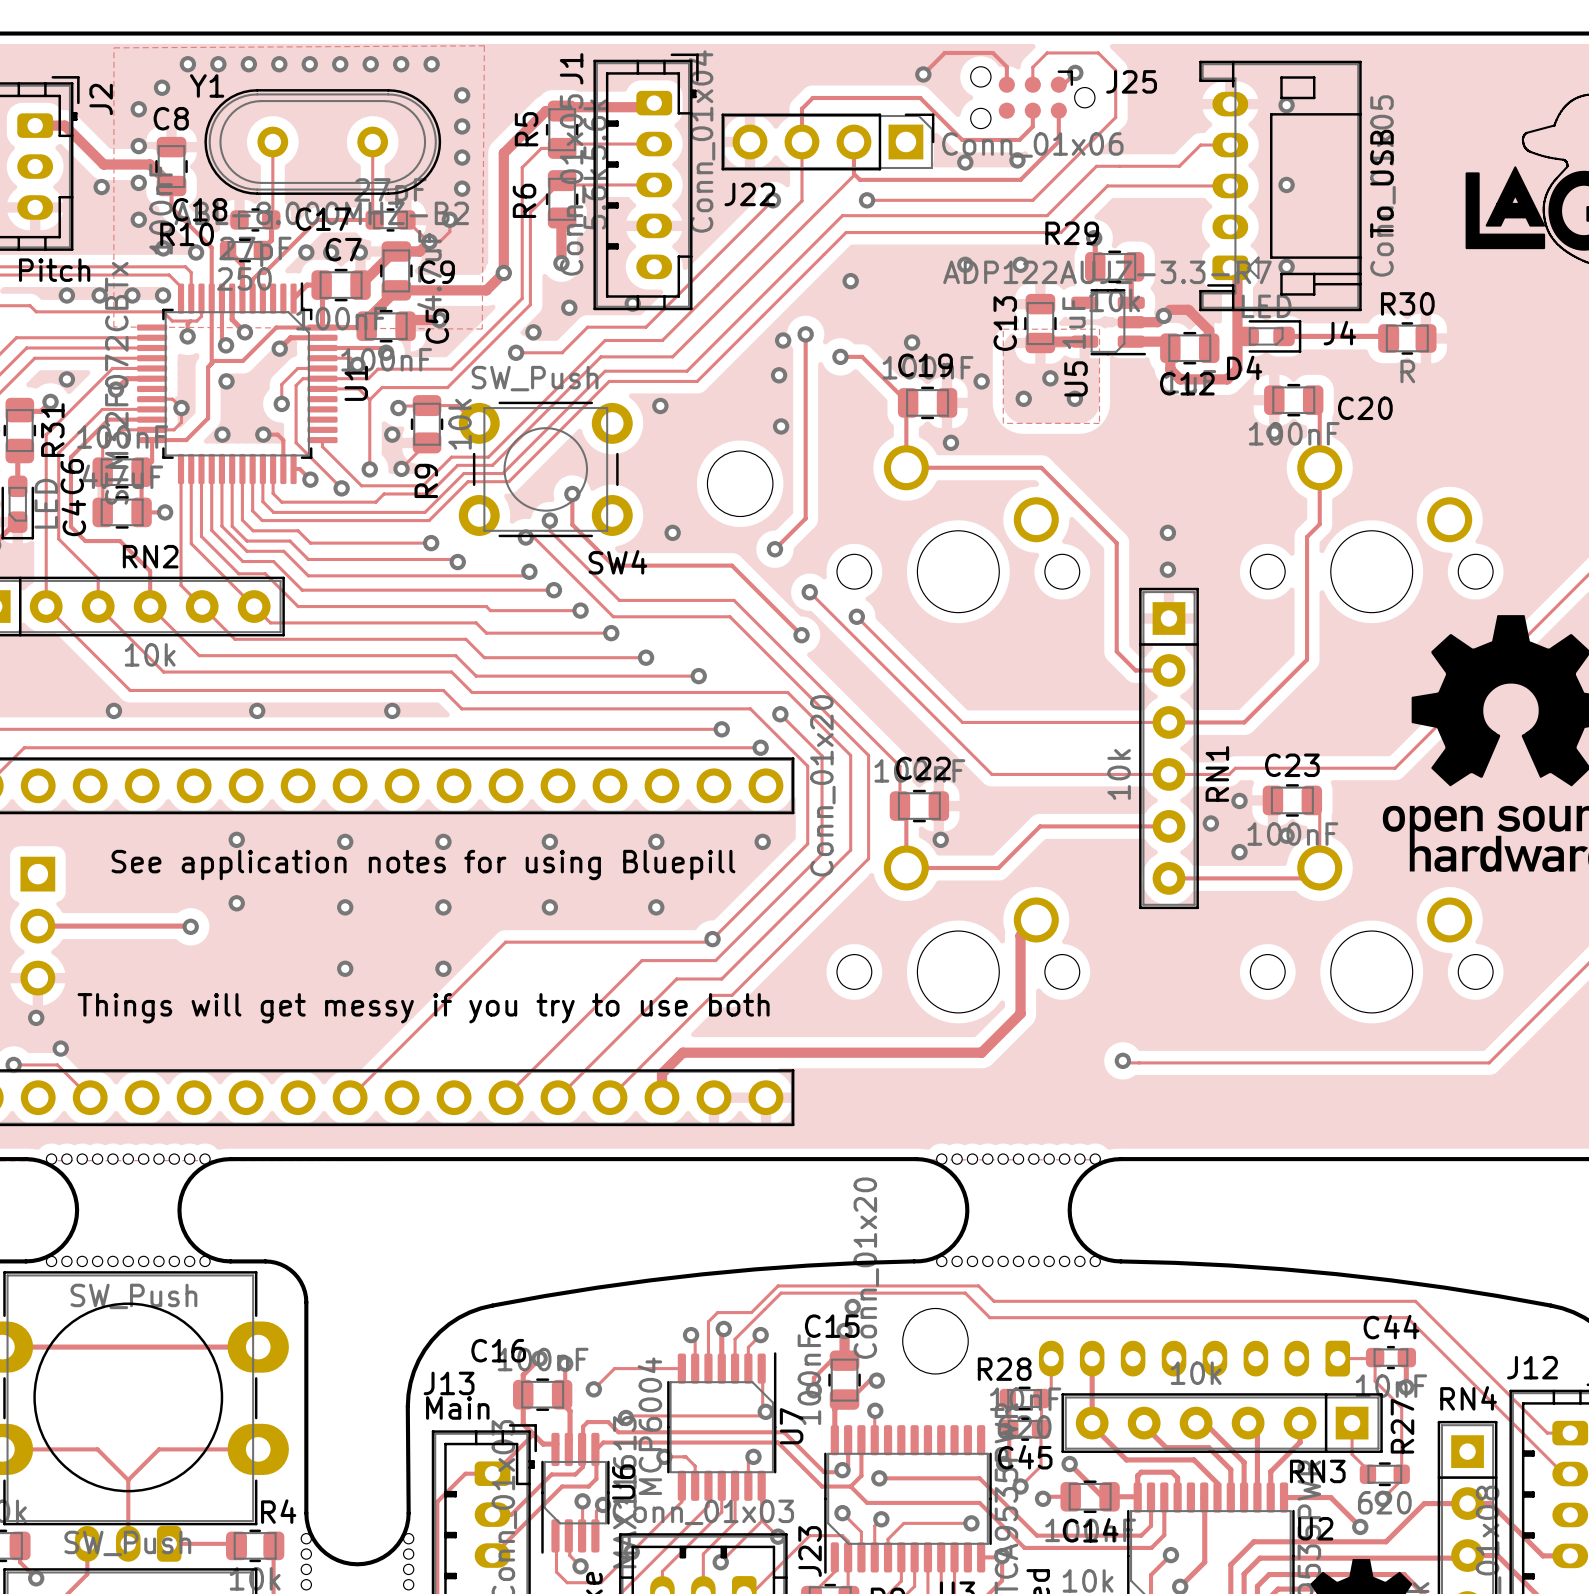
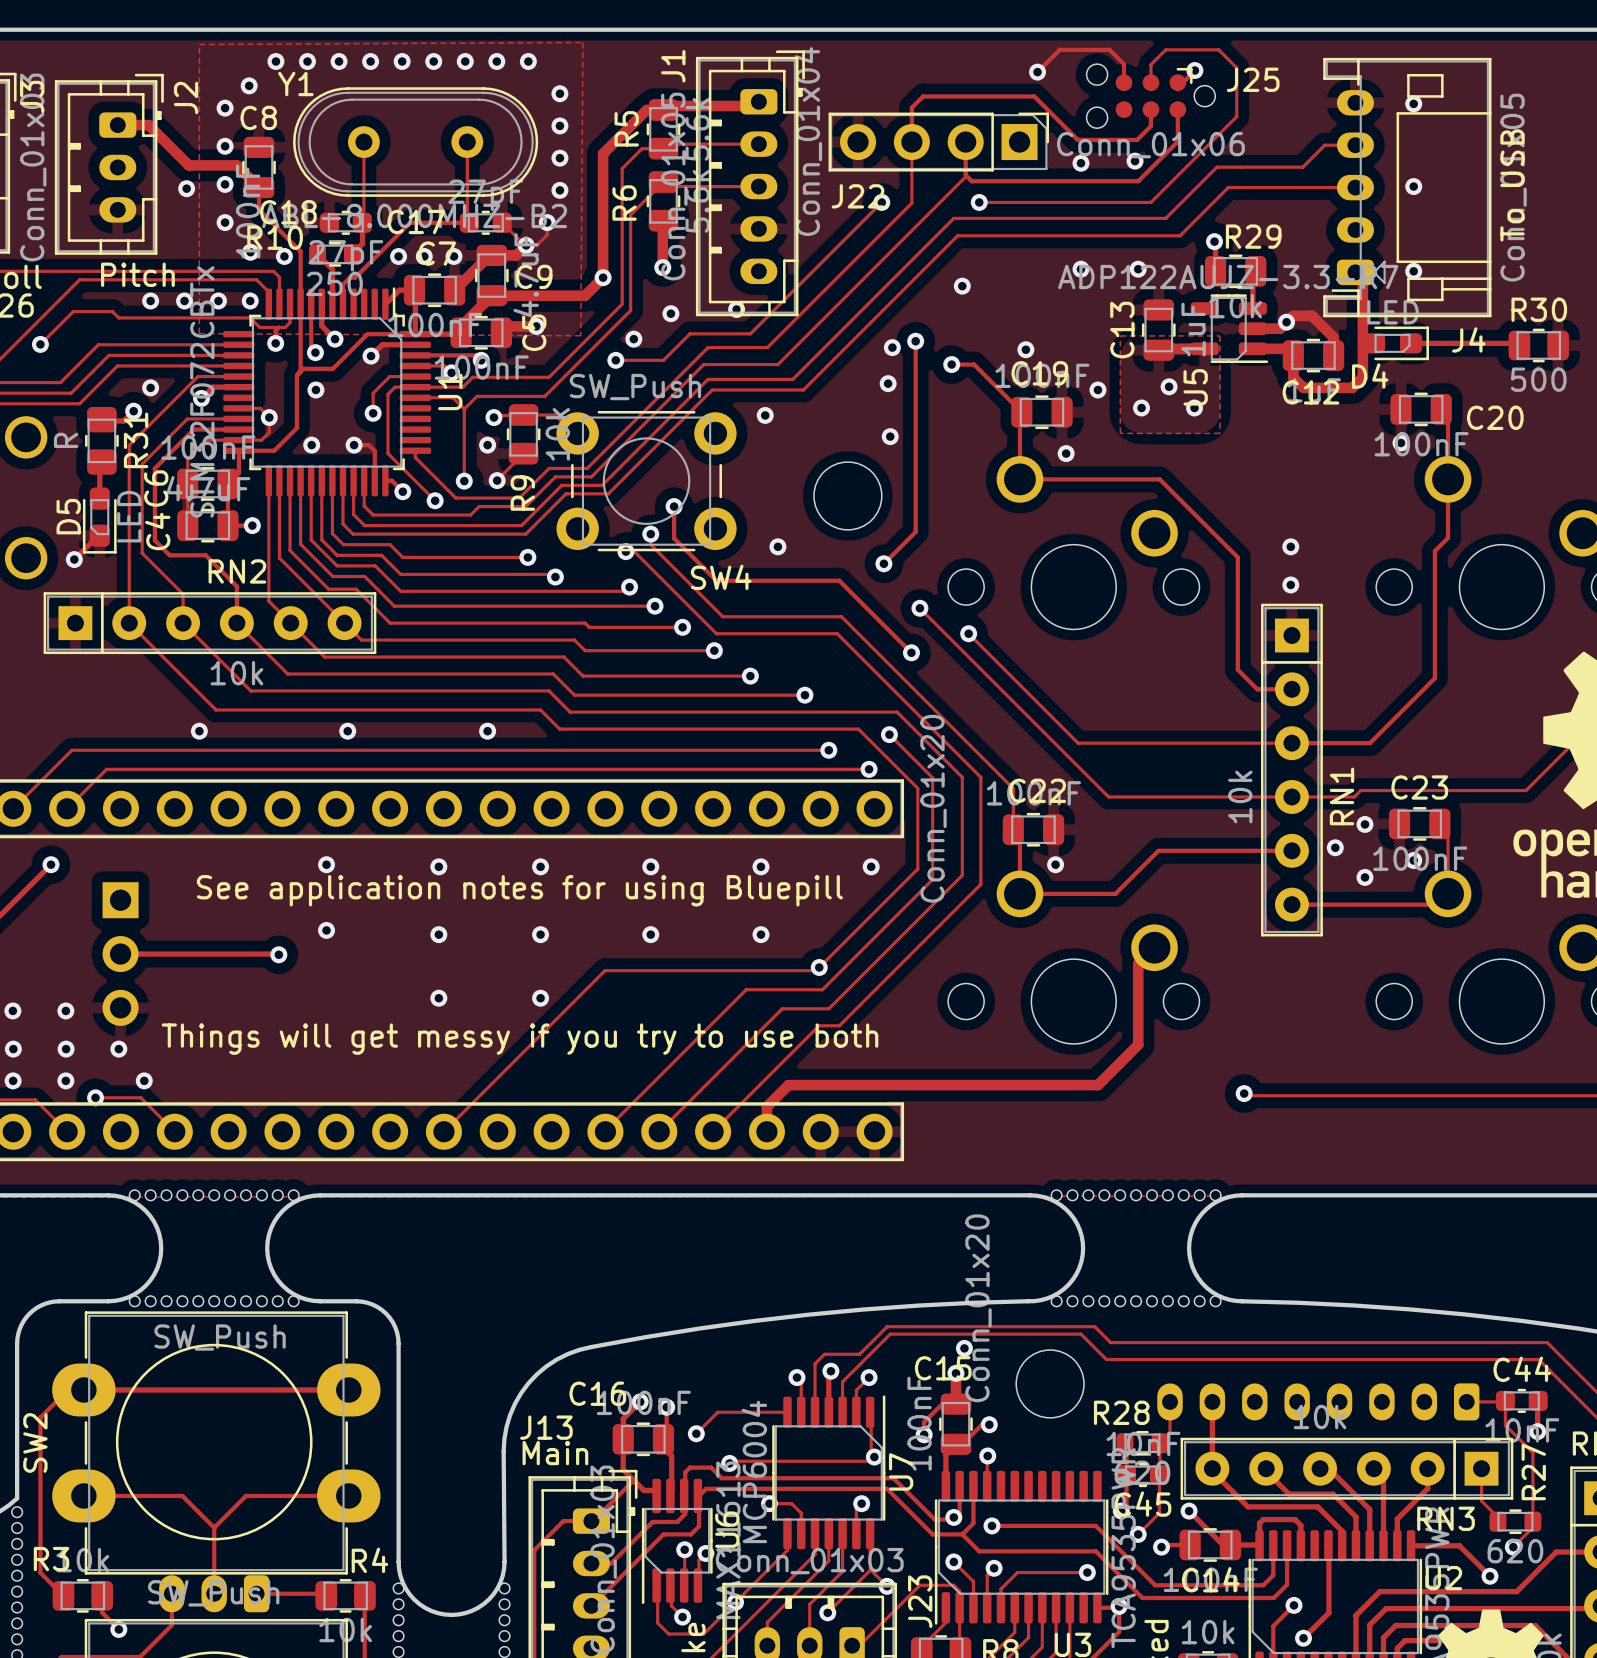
R29 name position: R29 (1072, 233) -> R29 (1253, 236)
R30 value: R (1407, 371) -> 500 (1538, 379)

